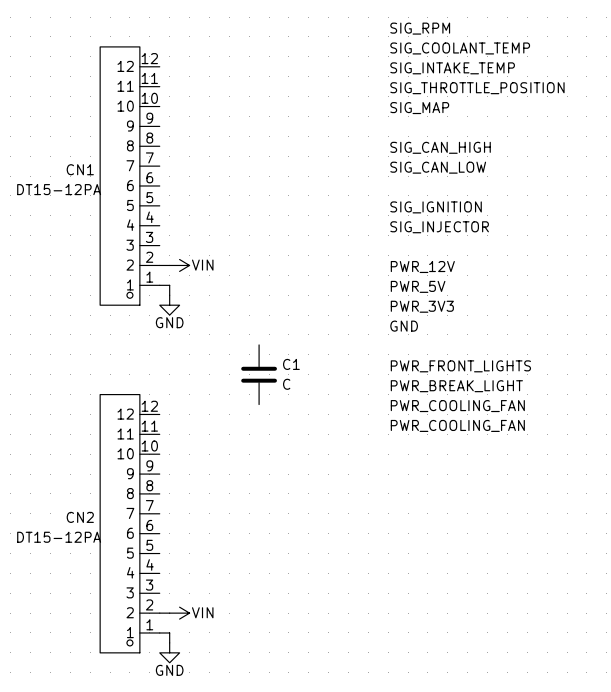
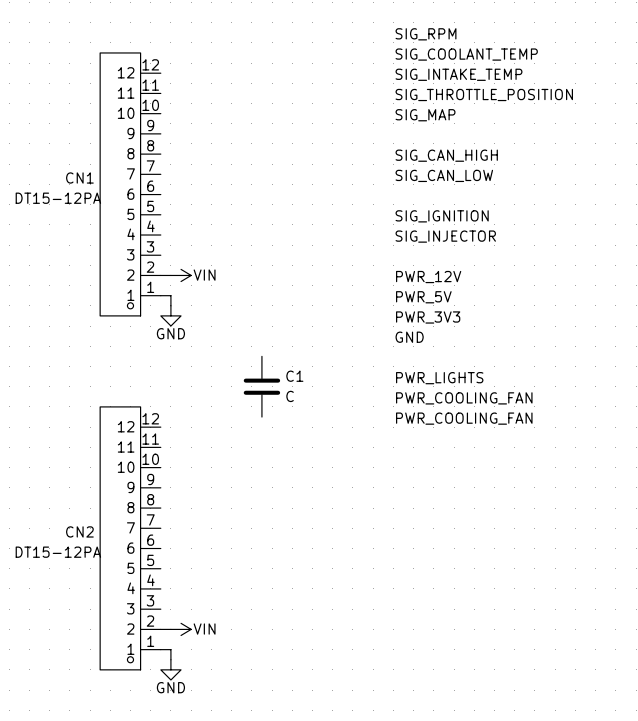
label: PWR_FRONT_LIGHTS (460, 366) -> PWR_LIGHTS (439, 378)
label: PWR_BREAK_LIGHT (456, 386) -> PWR_COOLING_FAN (464, 398)
label: PWR_COOLING_FAN (457, 425) -> none

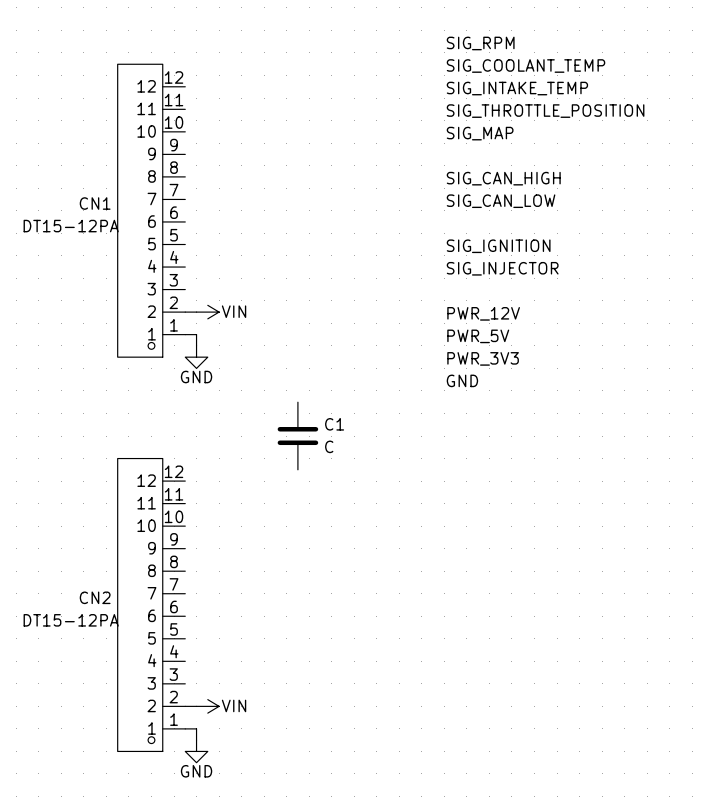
label: PWR_LIGHTS (439, 378) -> none
label: PWR_COOLING_FAN (464, 398) -> none
label: PWR_COOLING_FAN (464, 418) -> none

